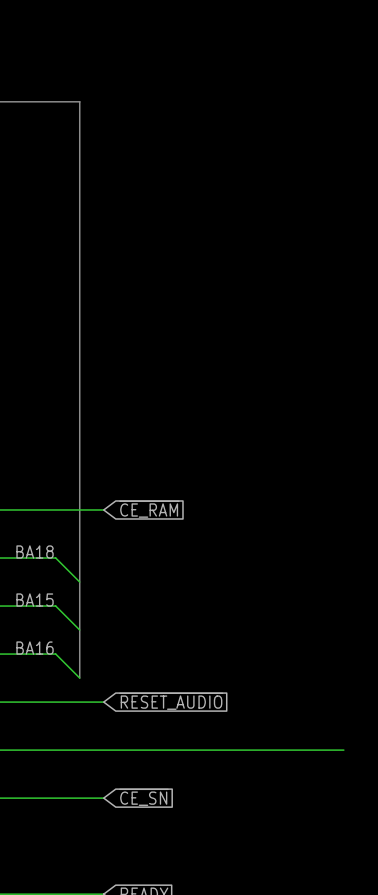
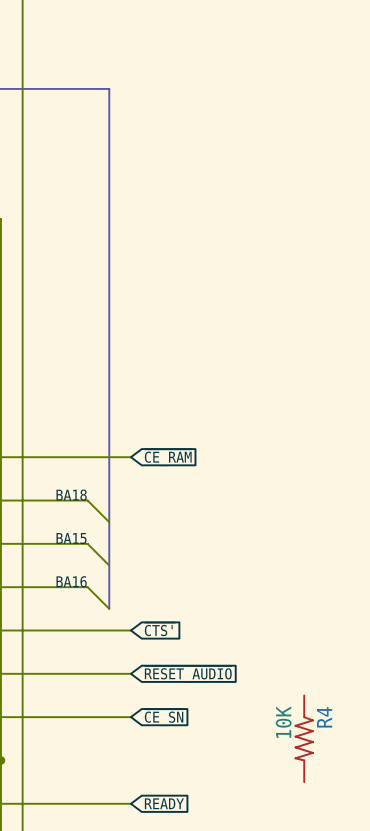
global label: ~{RESET_AUDIO} (171, 701) -> ~{CTS'} (160, 629)
global label: none -> ~{RESET_AUDIO} (188, 674)
wire: (103, 750) (343, 750) -> none
R4: none -> 10K (304, 738)

